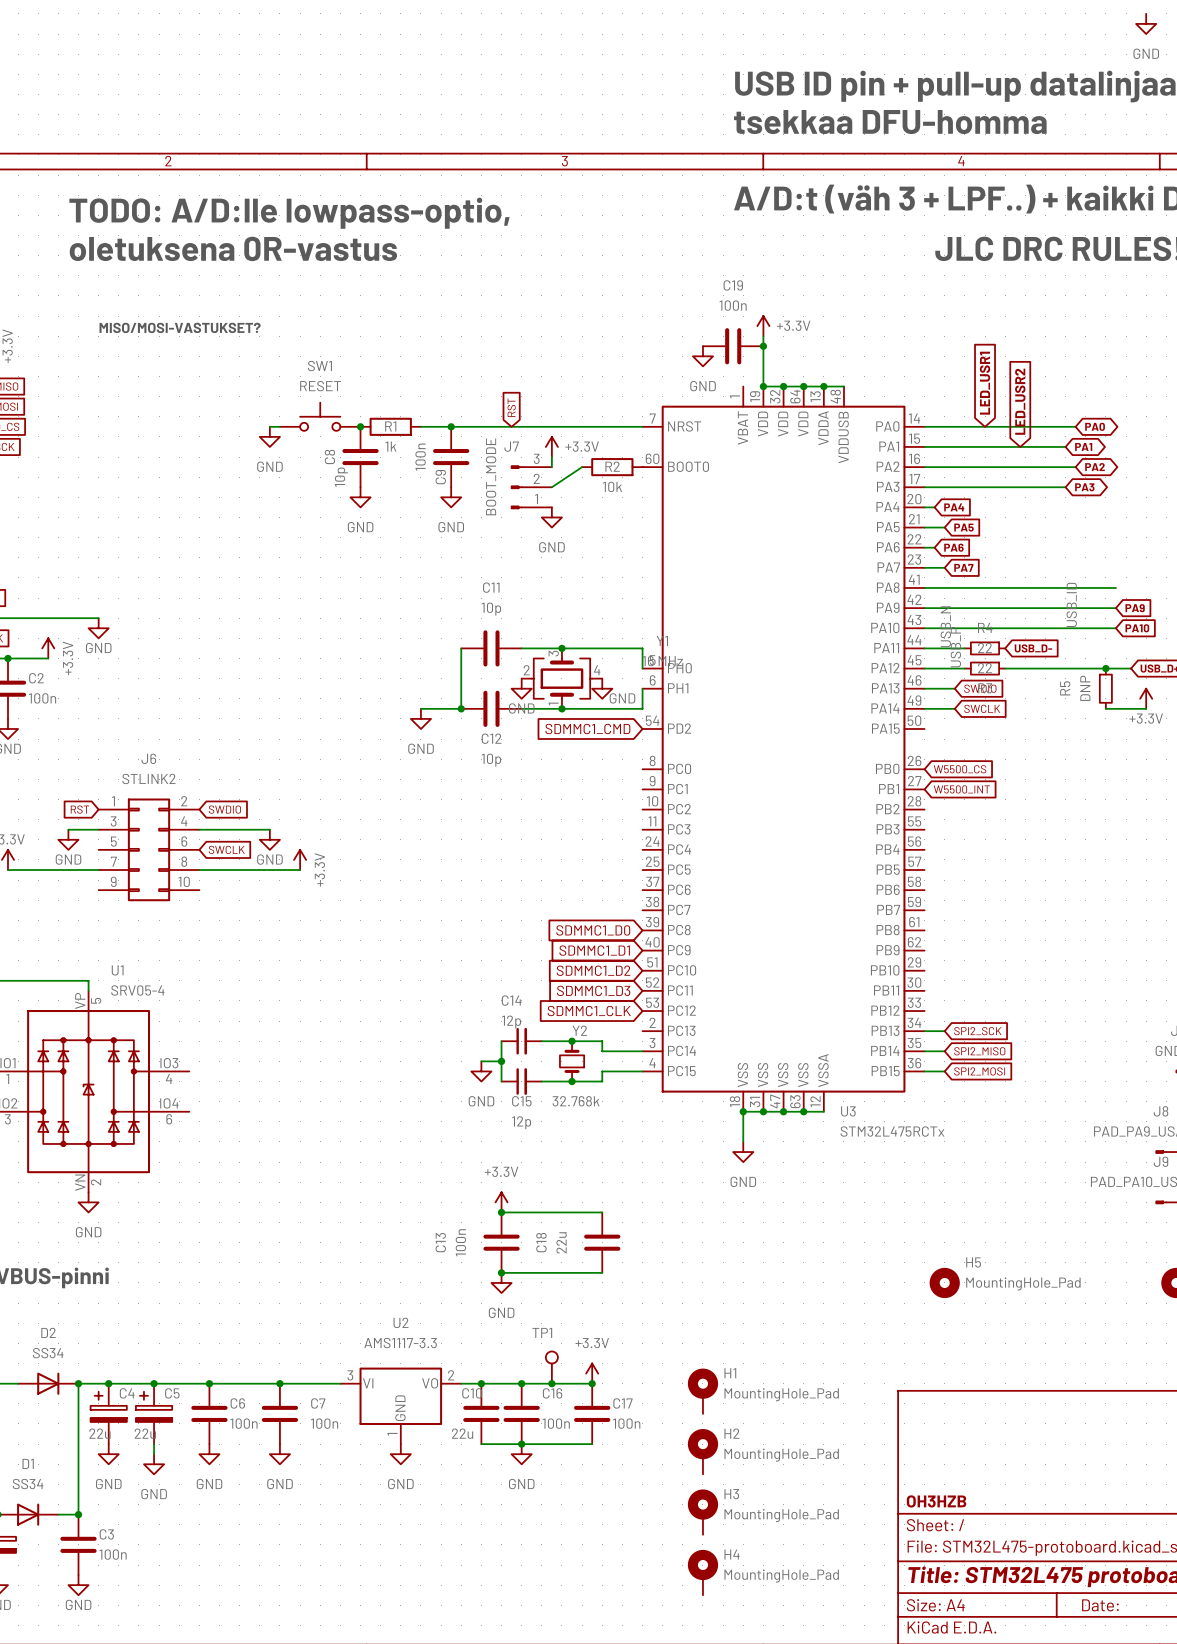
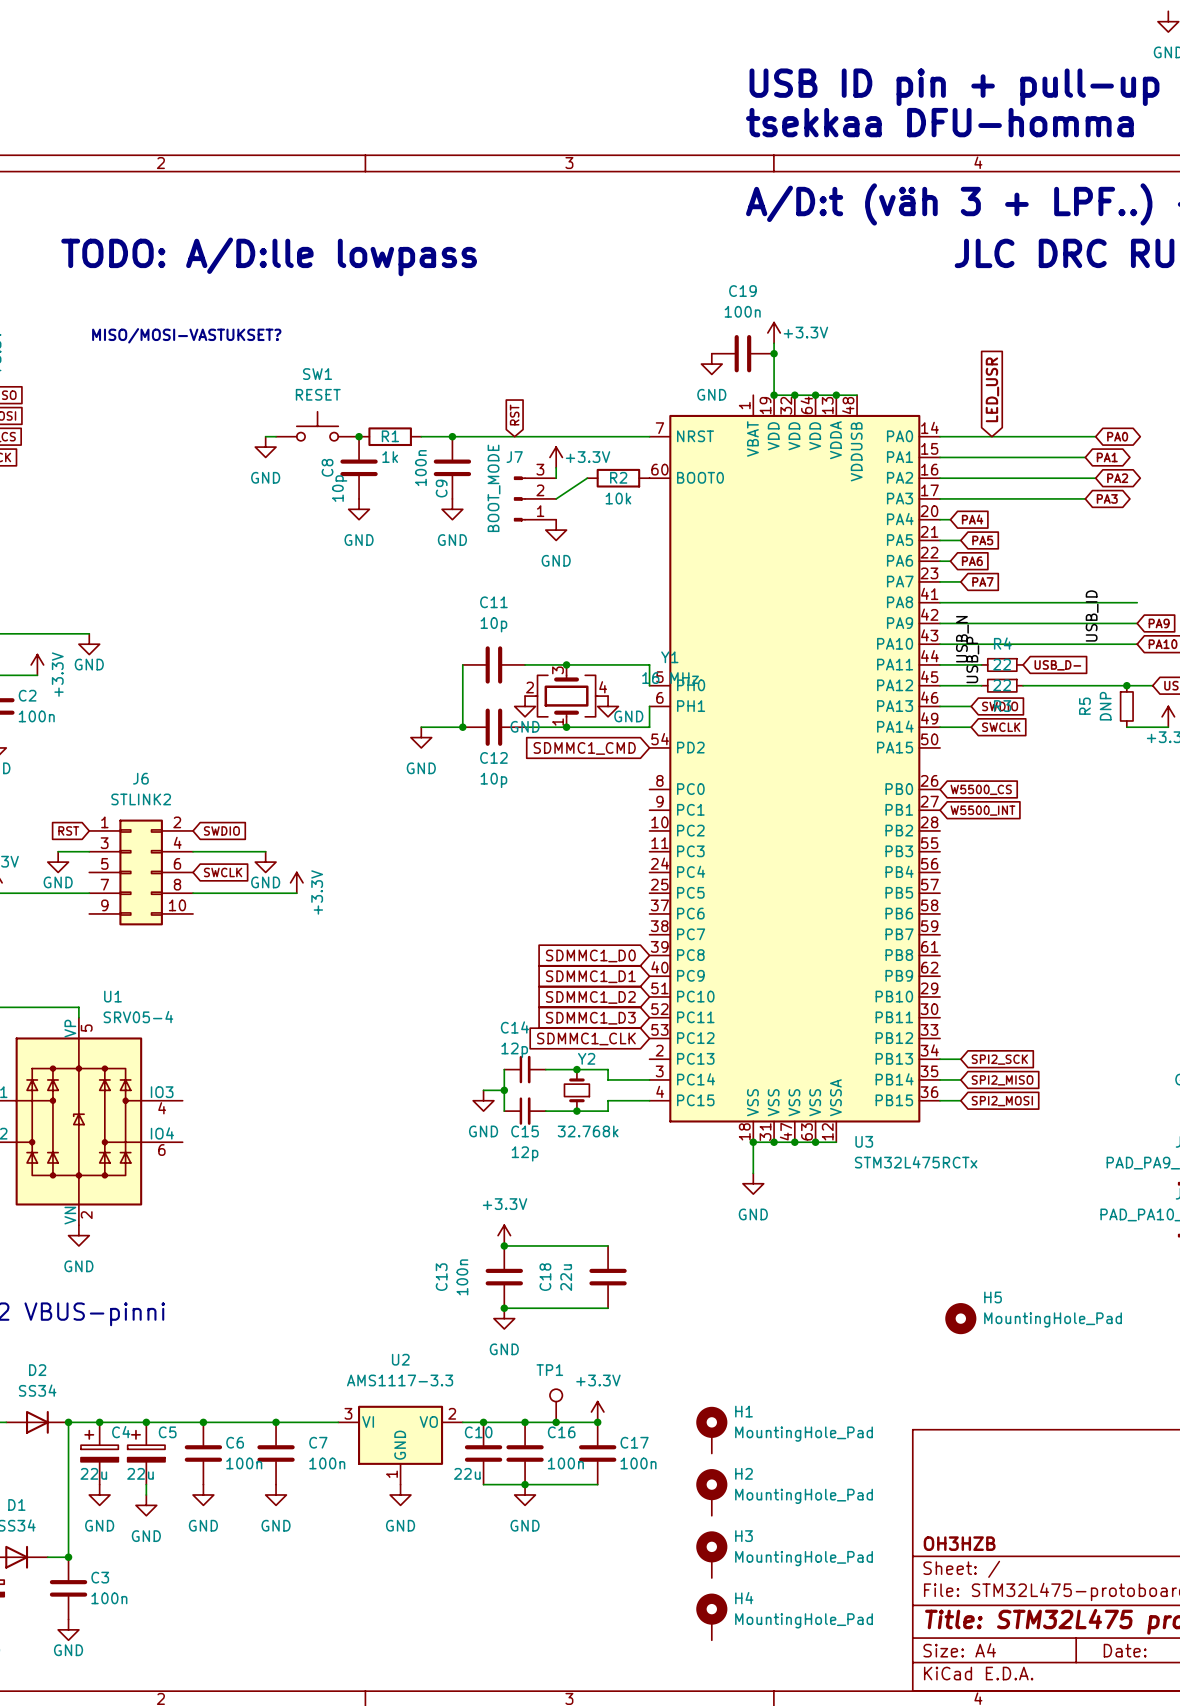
text: TODO: A/D:lle lowpass-optio, (289, 213) -> none
text: oletuksena 0R-vastus (233, 248) -> TODO: A/D:lle lowpass (269, 256)
global label: LED_USR1 (985, 383) -> LED_USR (992, 389)
global label: LED_USR2 (1020, 401) -> none

